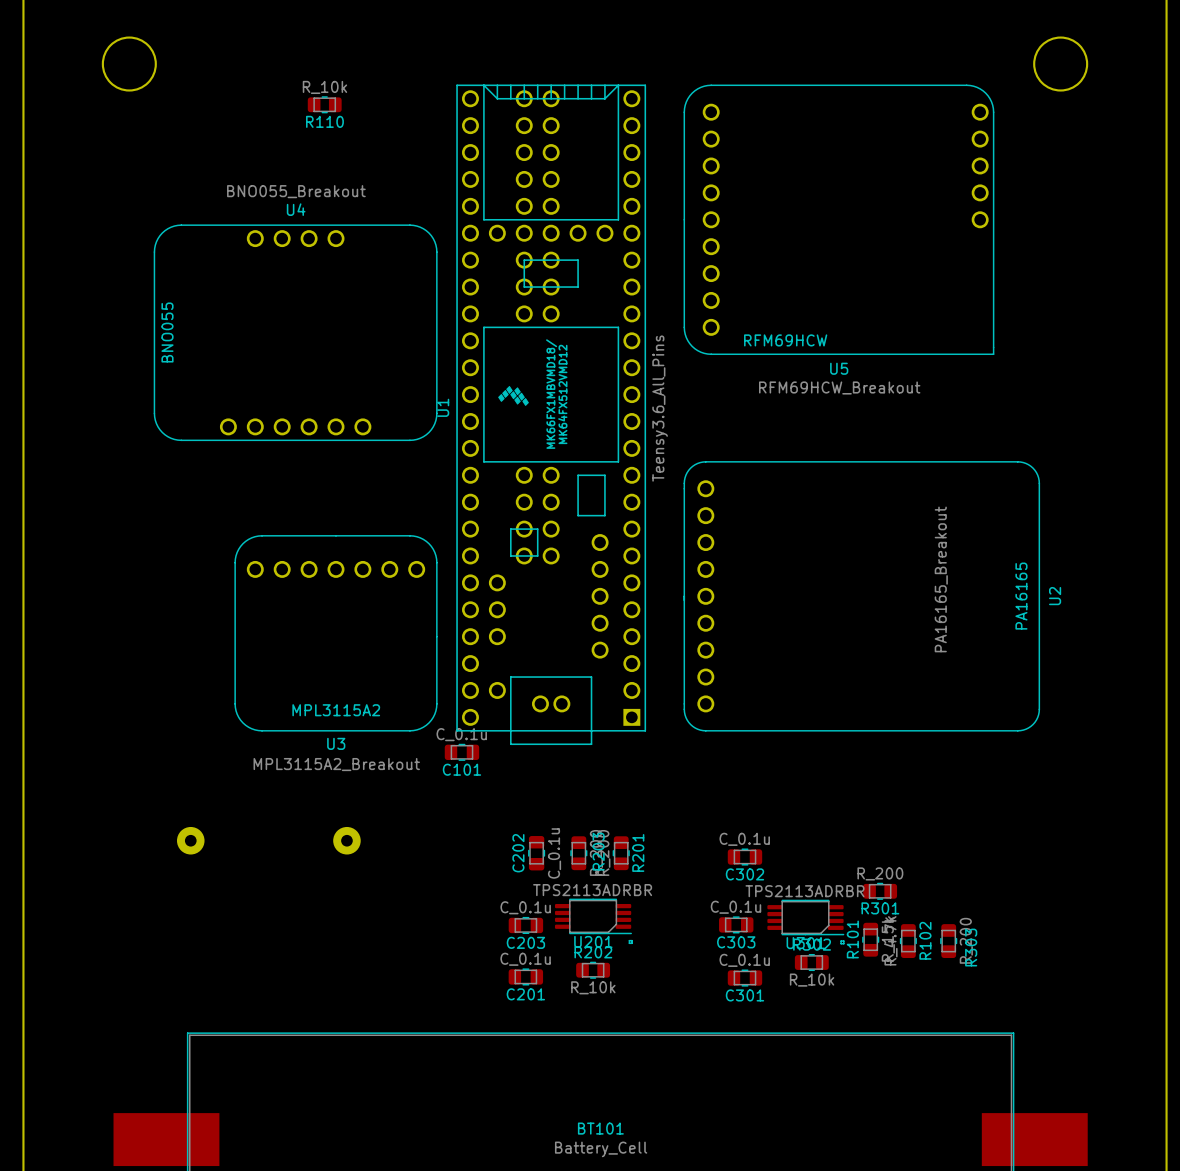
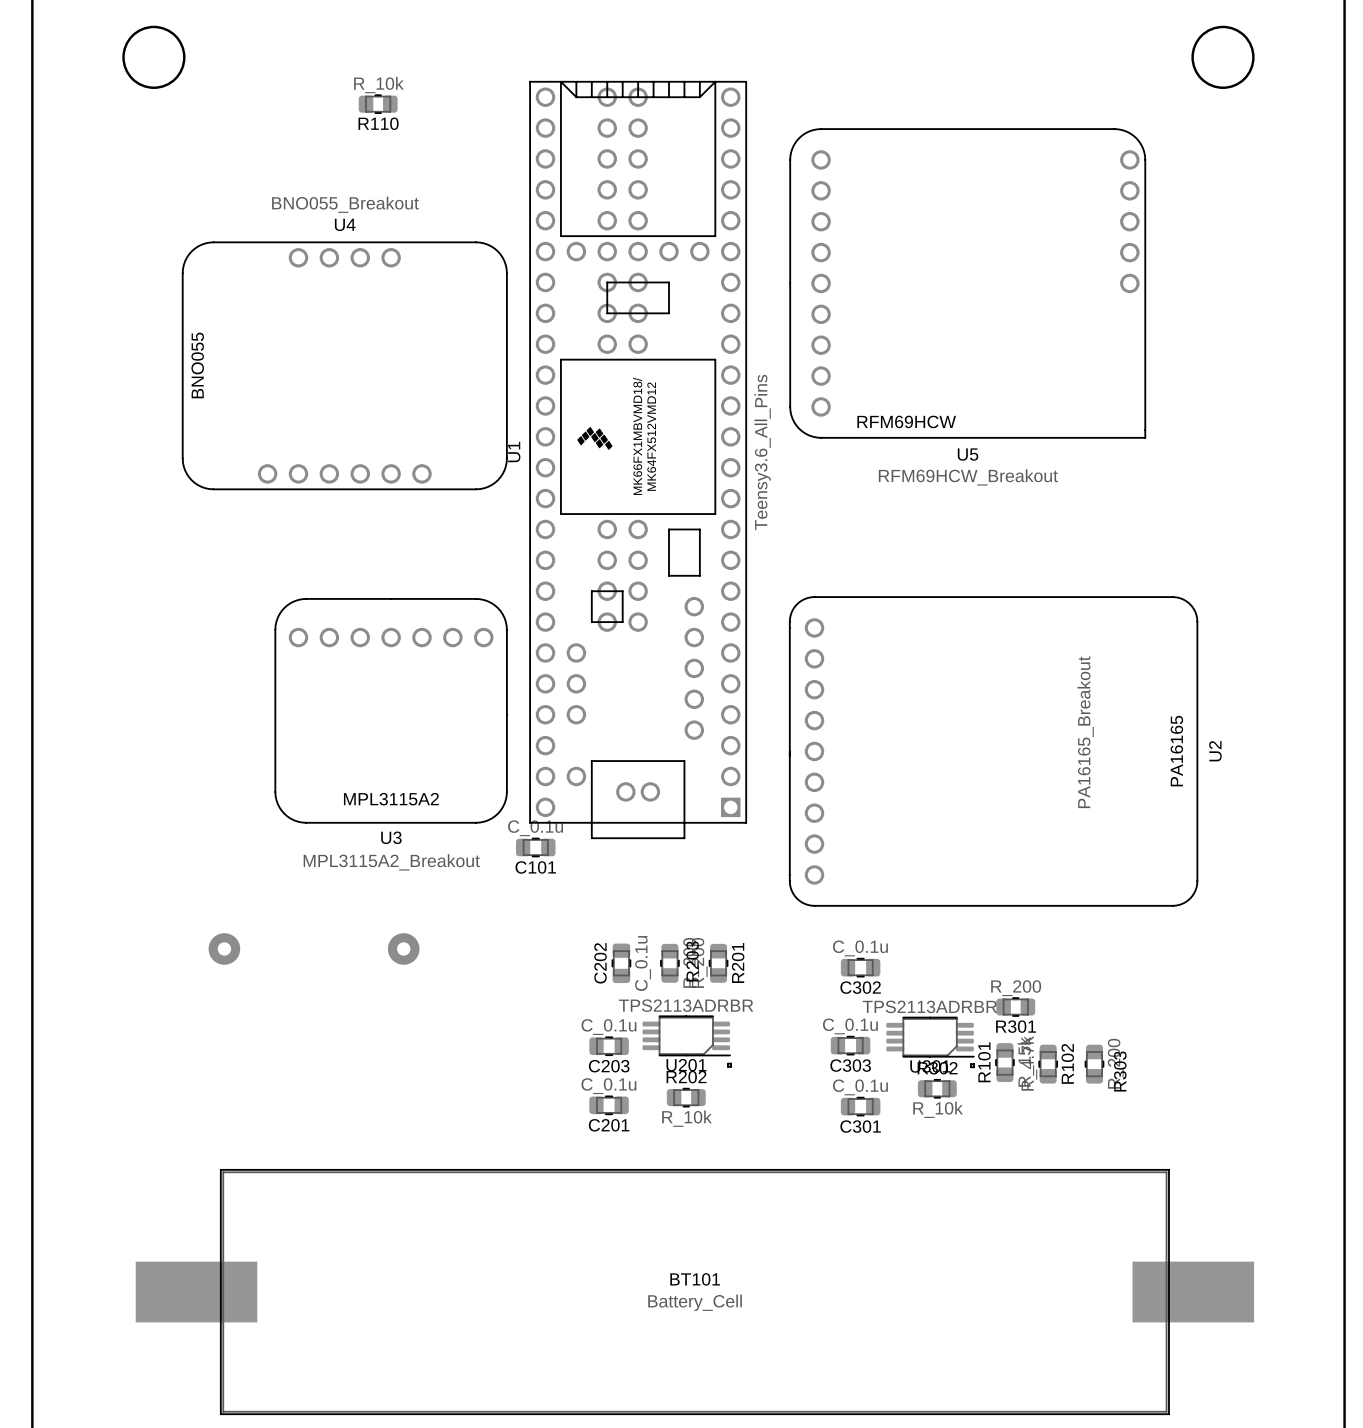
U5 position: (838, 219) -> (967, 283)
U2 position: (861, 596) -> (993, 751)

